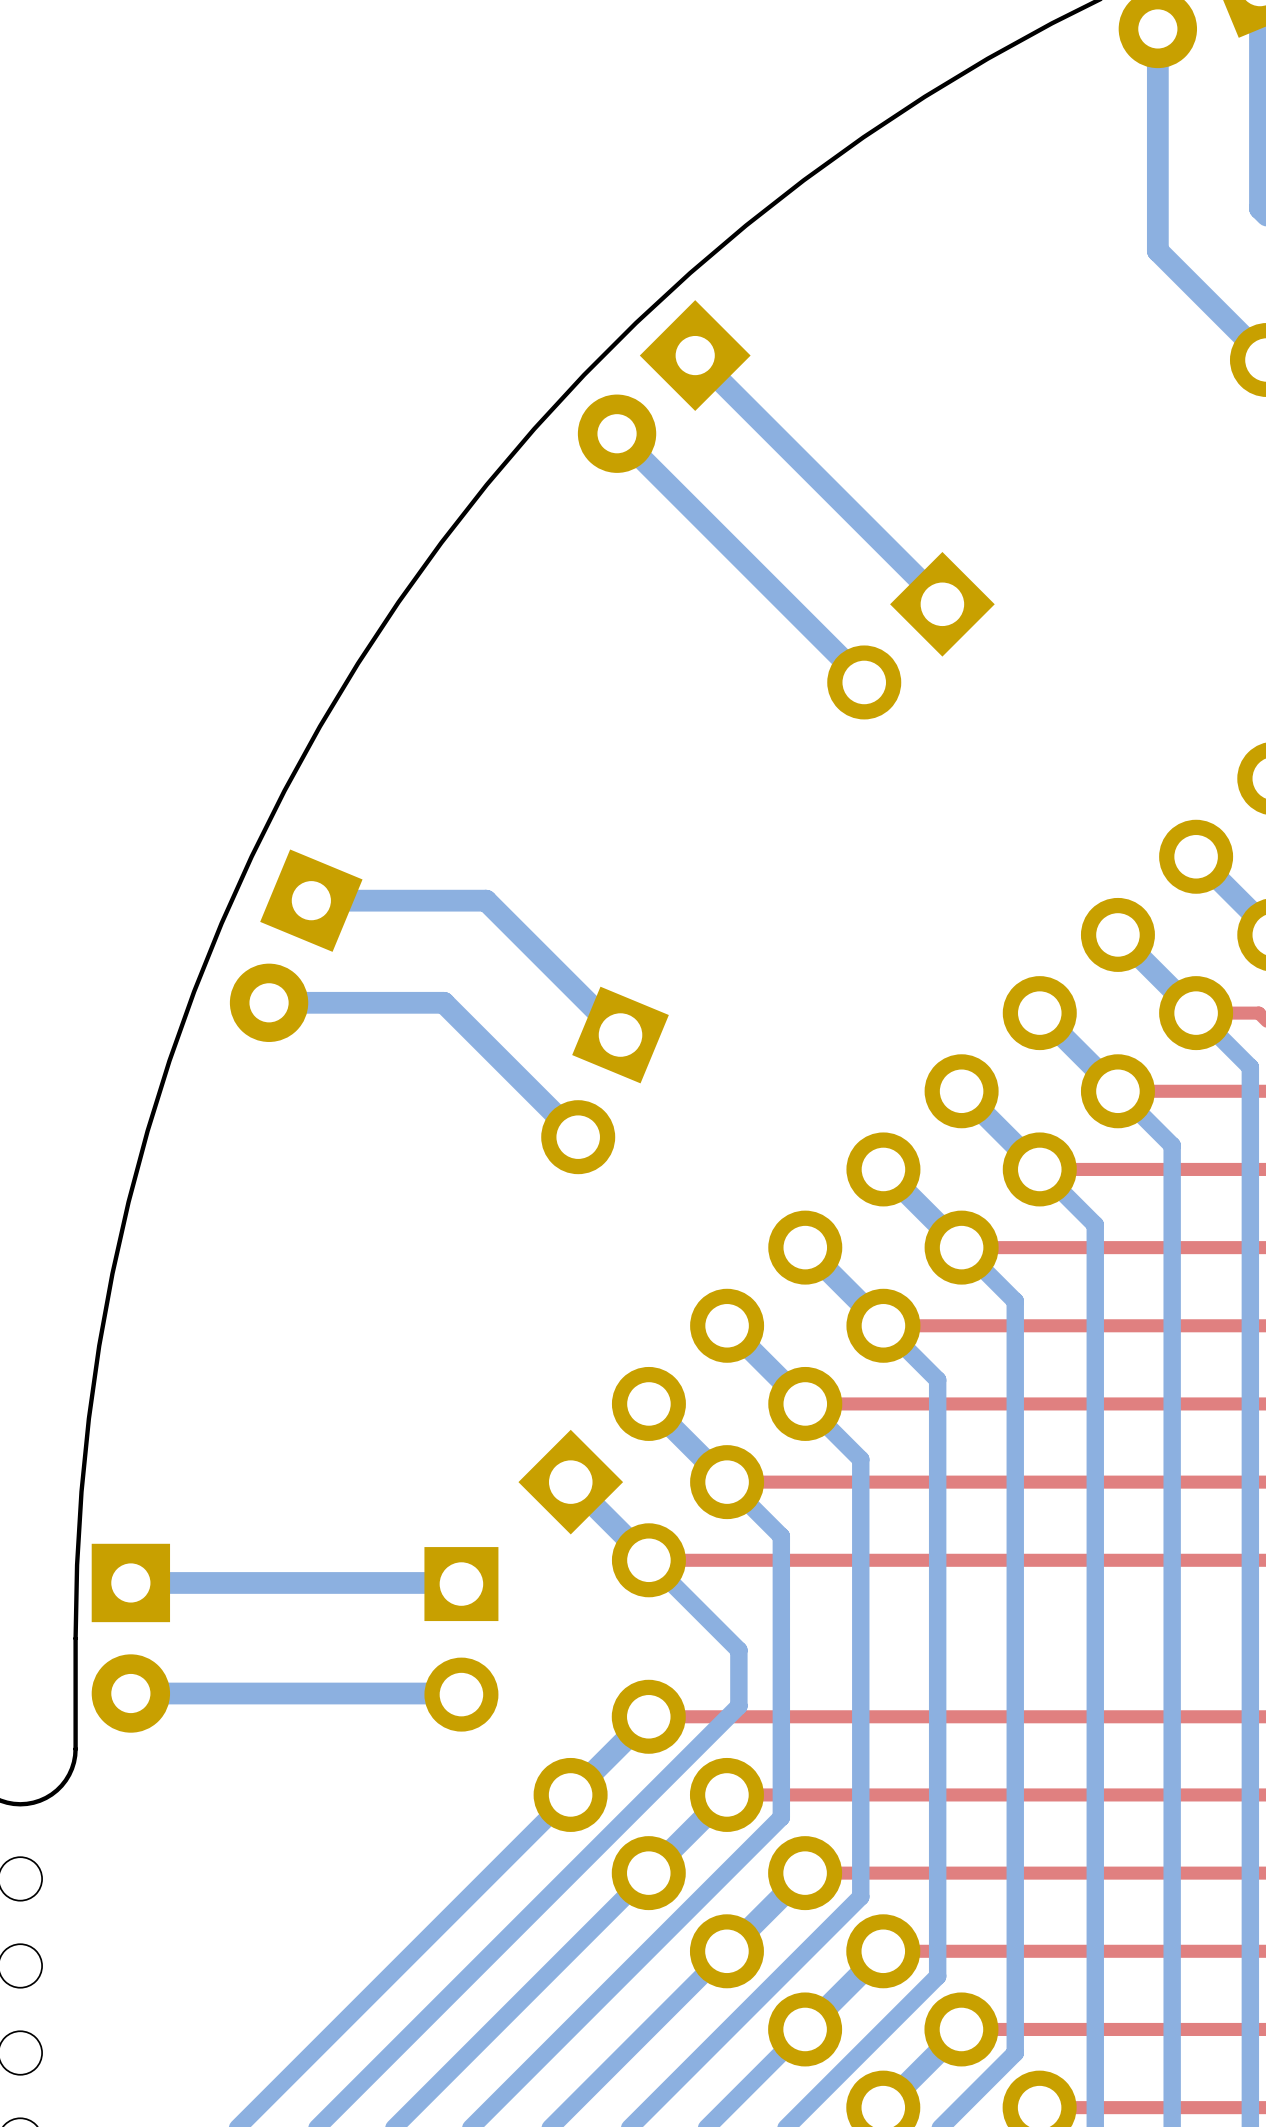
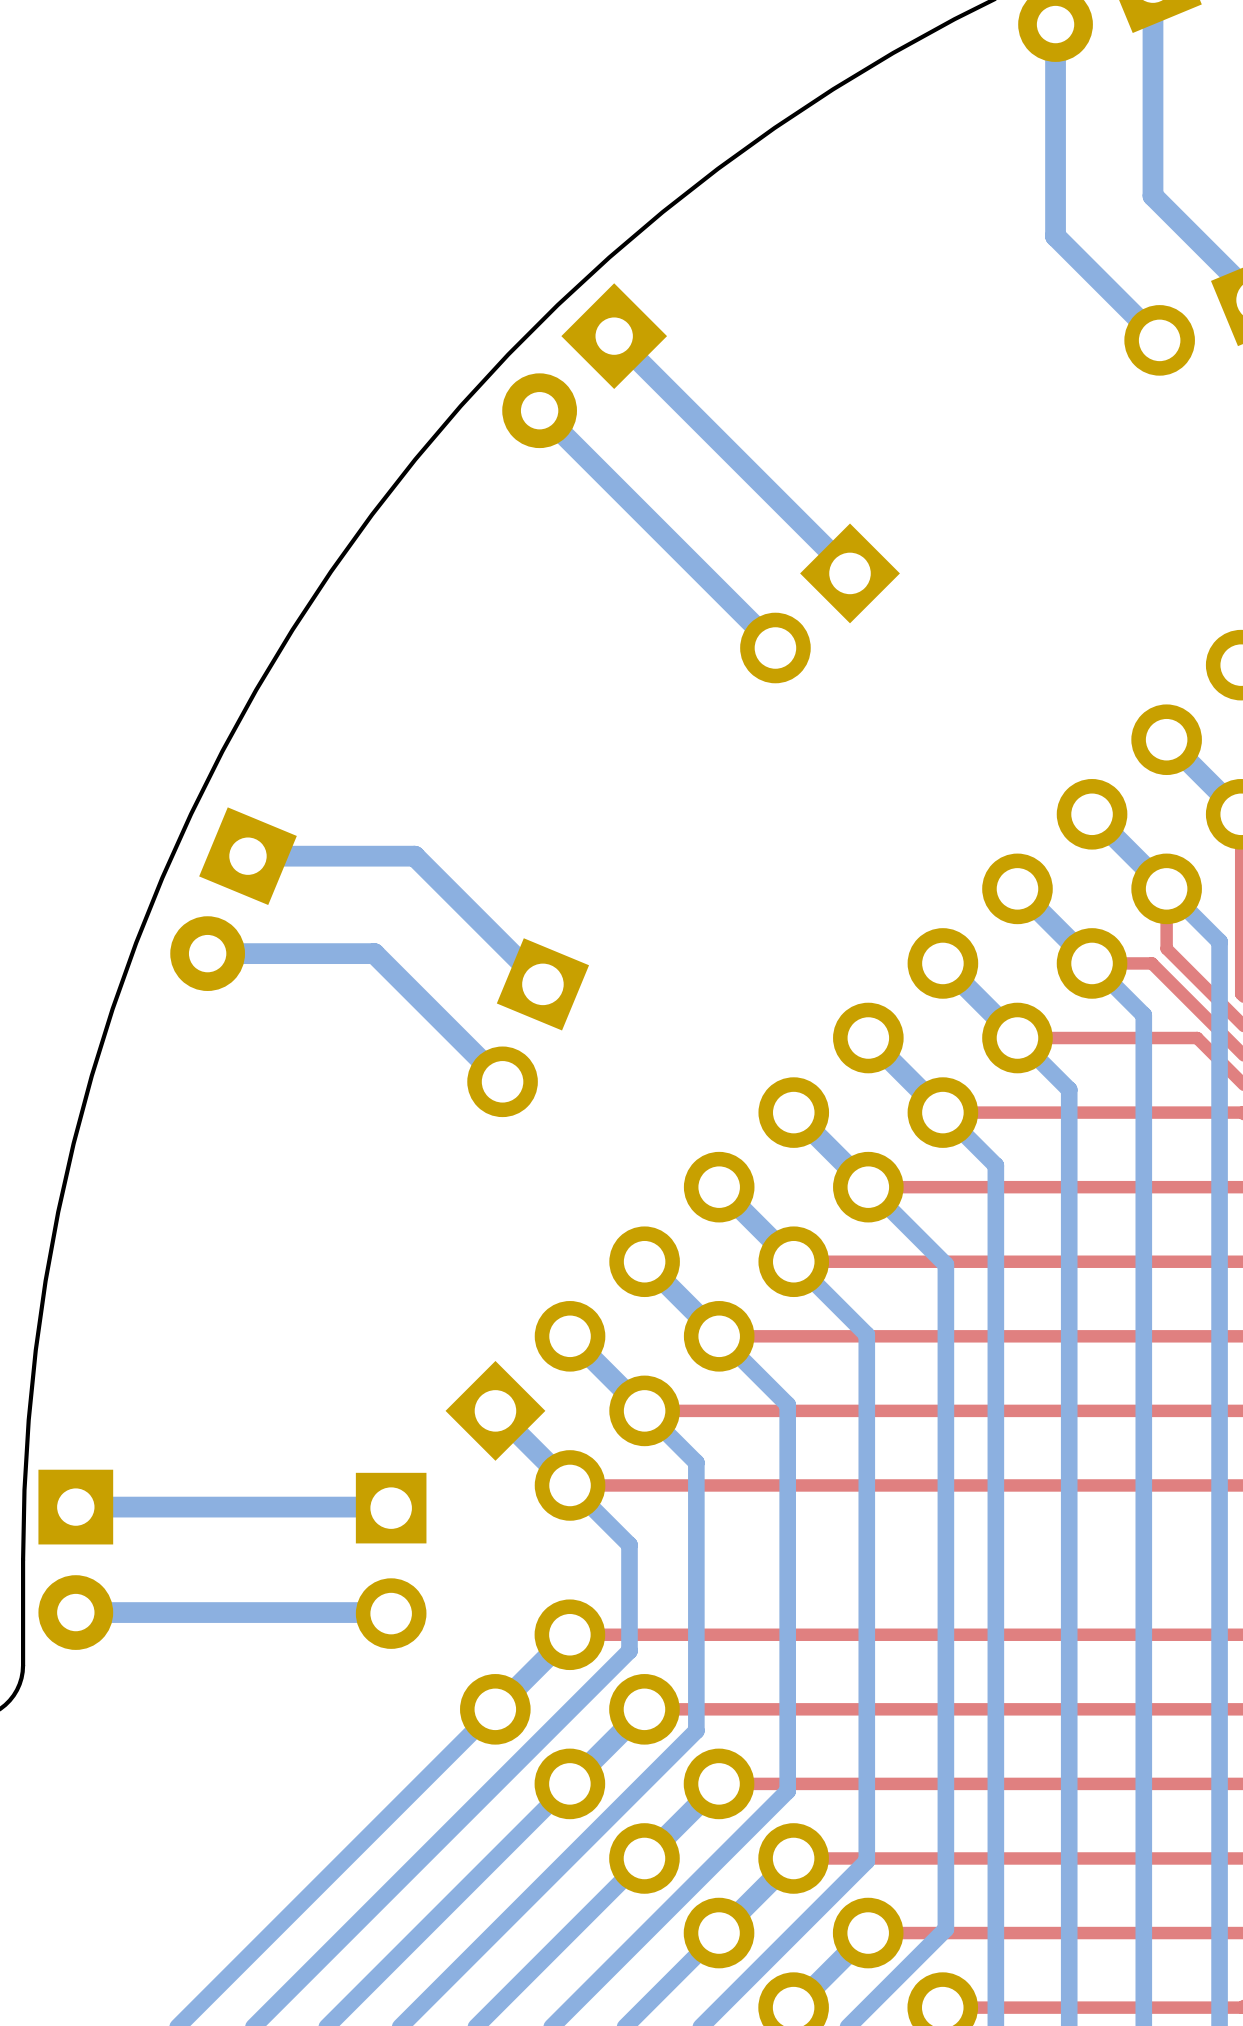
bottom track: (1015, 1301) (1015, 2053) -> (919, 1238) (945, 1264) (945, 1929) (919, 1955)
bottom track: (937, 1380) (937, 1976) -> (845, 1313) (866, 1334) (866, 1861) (845, 1882)
bottom track: (860, 1459) (860, 1896) -> (772, 1389) (787, 1404) (787, 1791) (772, 1806)
bottom track: (711, 1622) (738, 1650) (738, 1706) (711, 1733) -> (629, 1544) (629, 1650)

